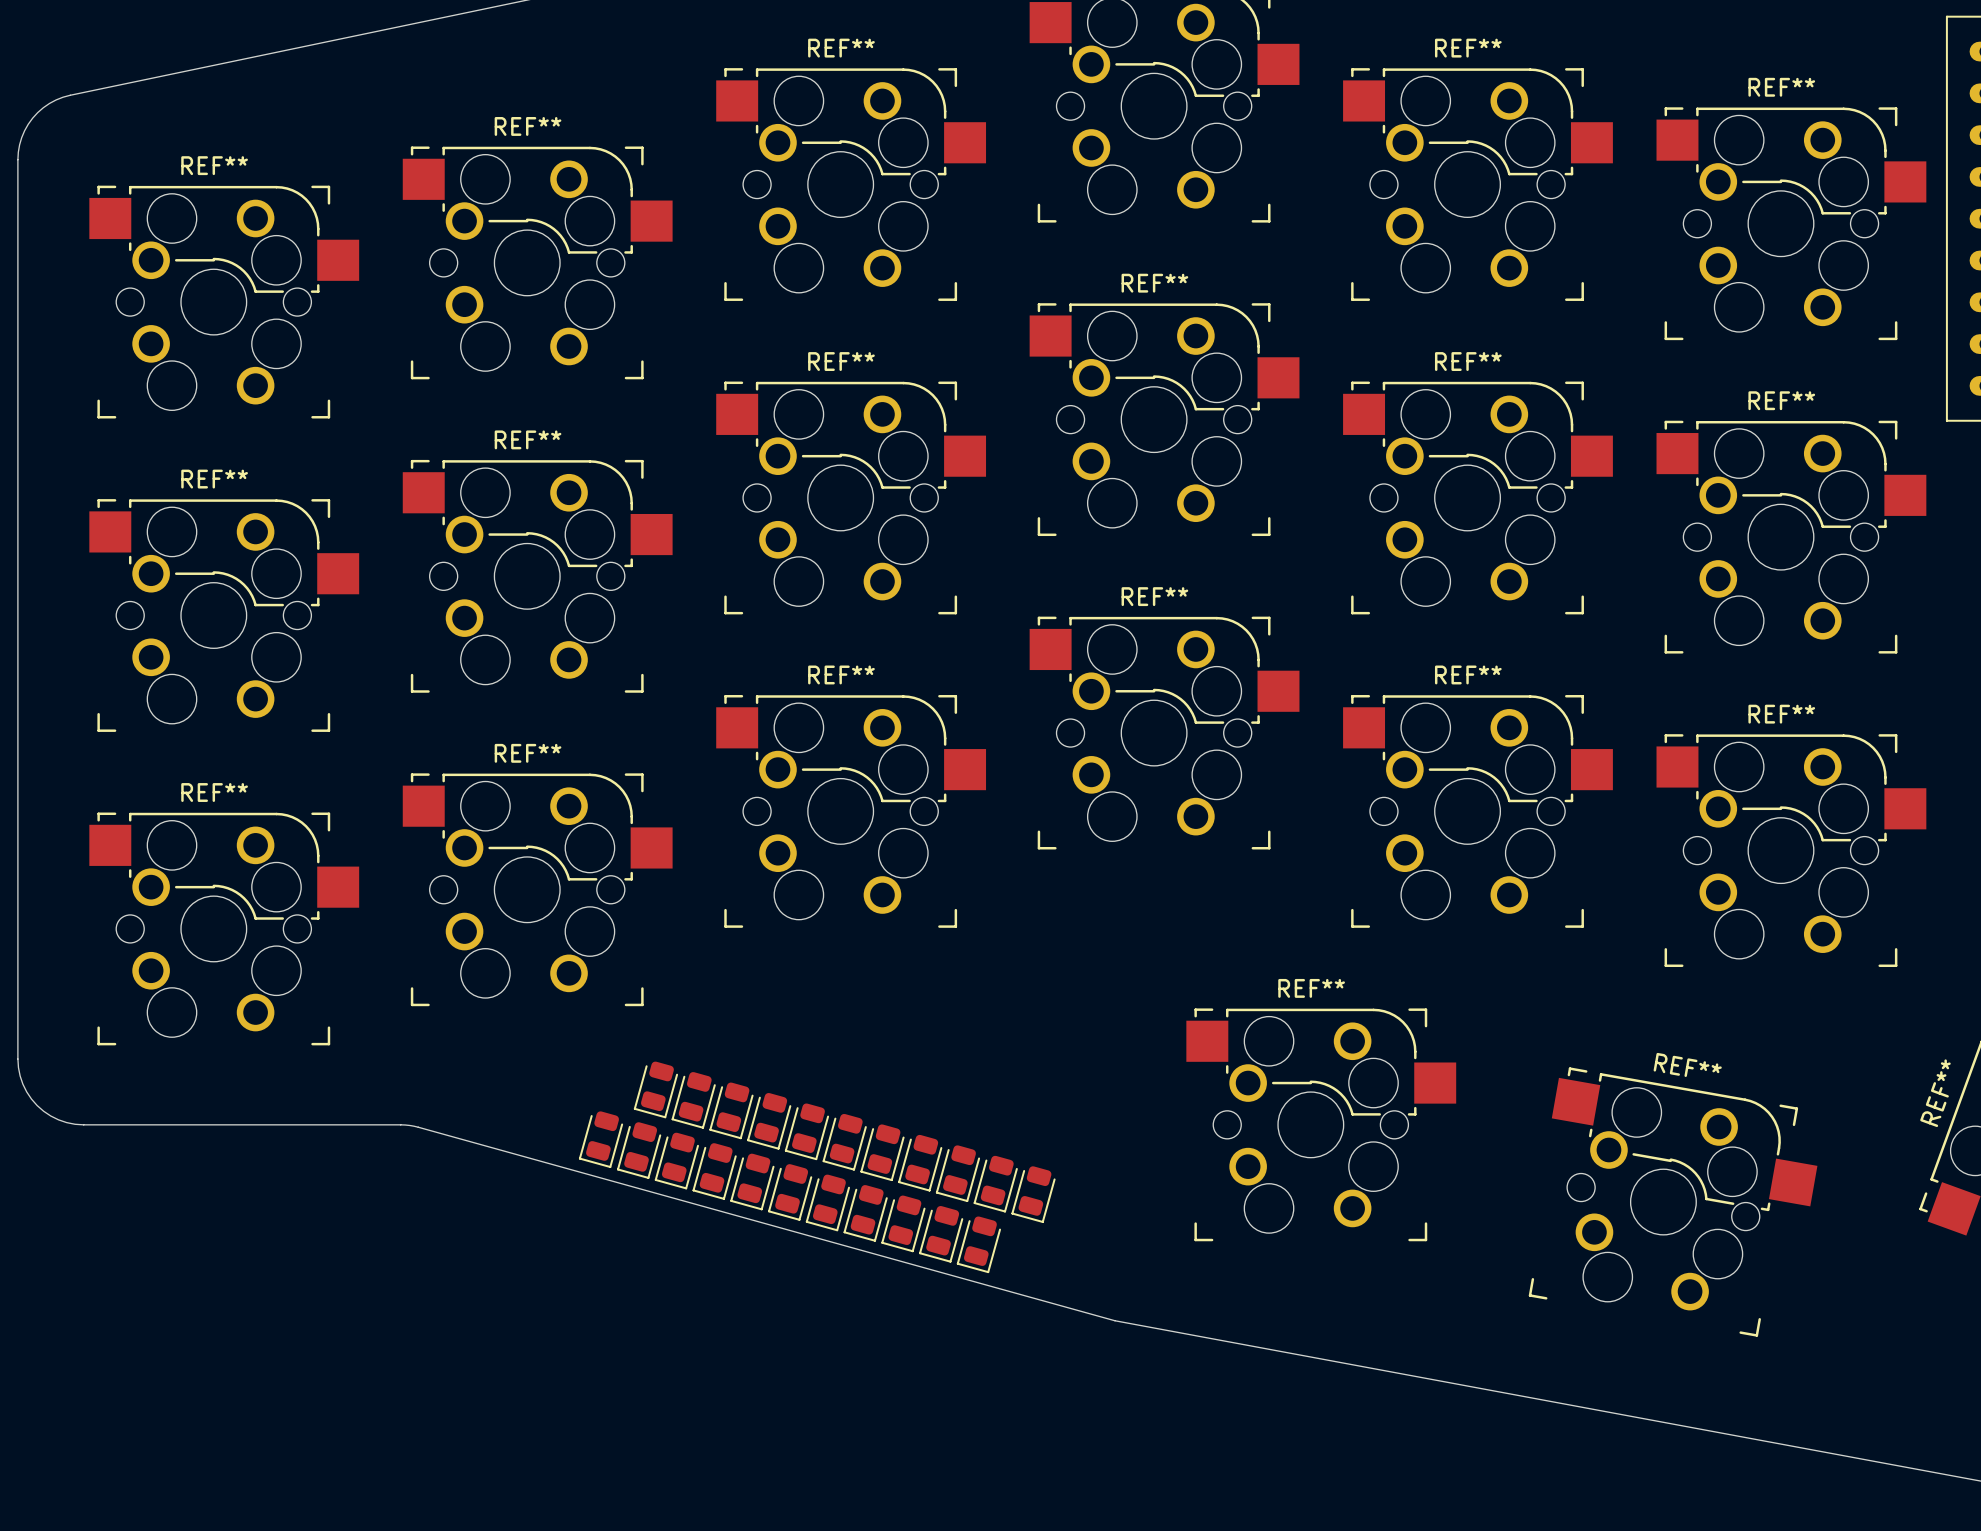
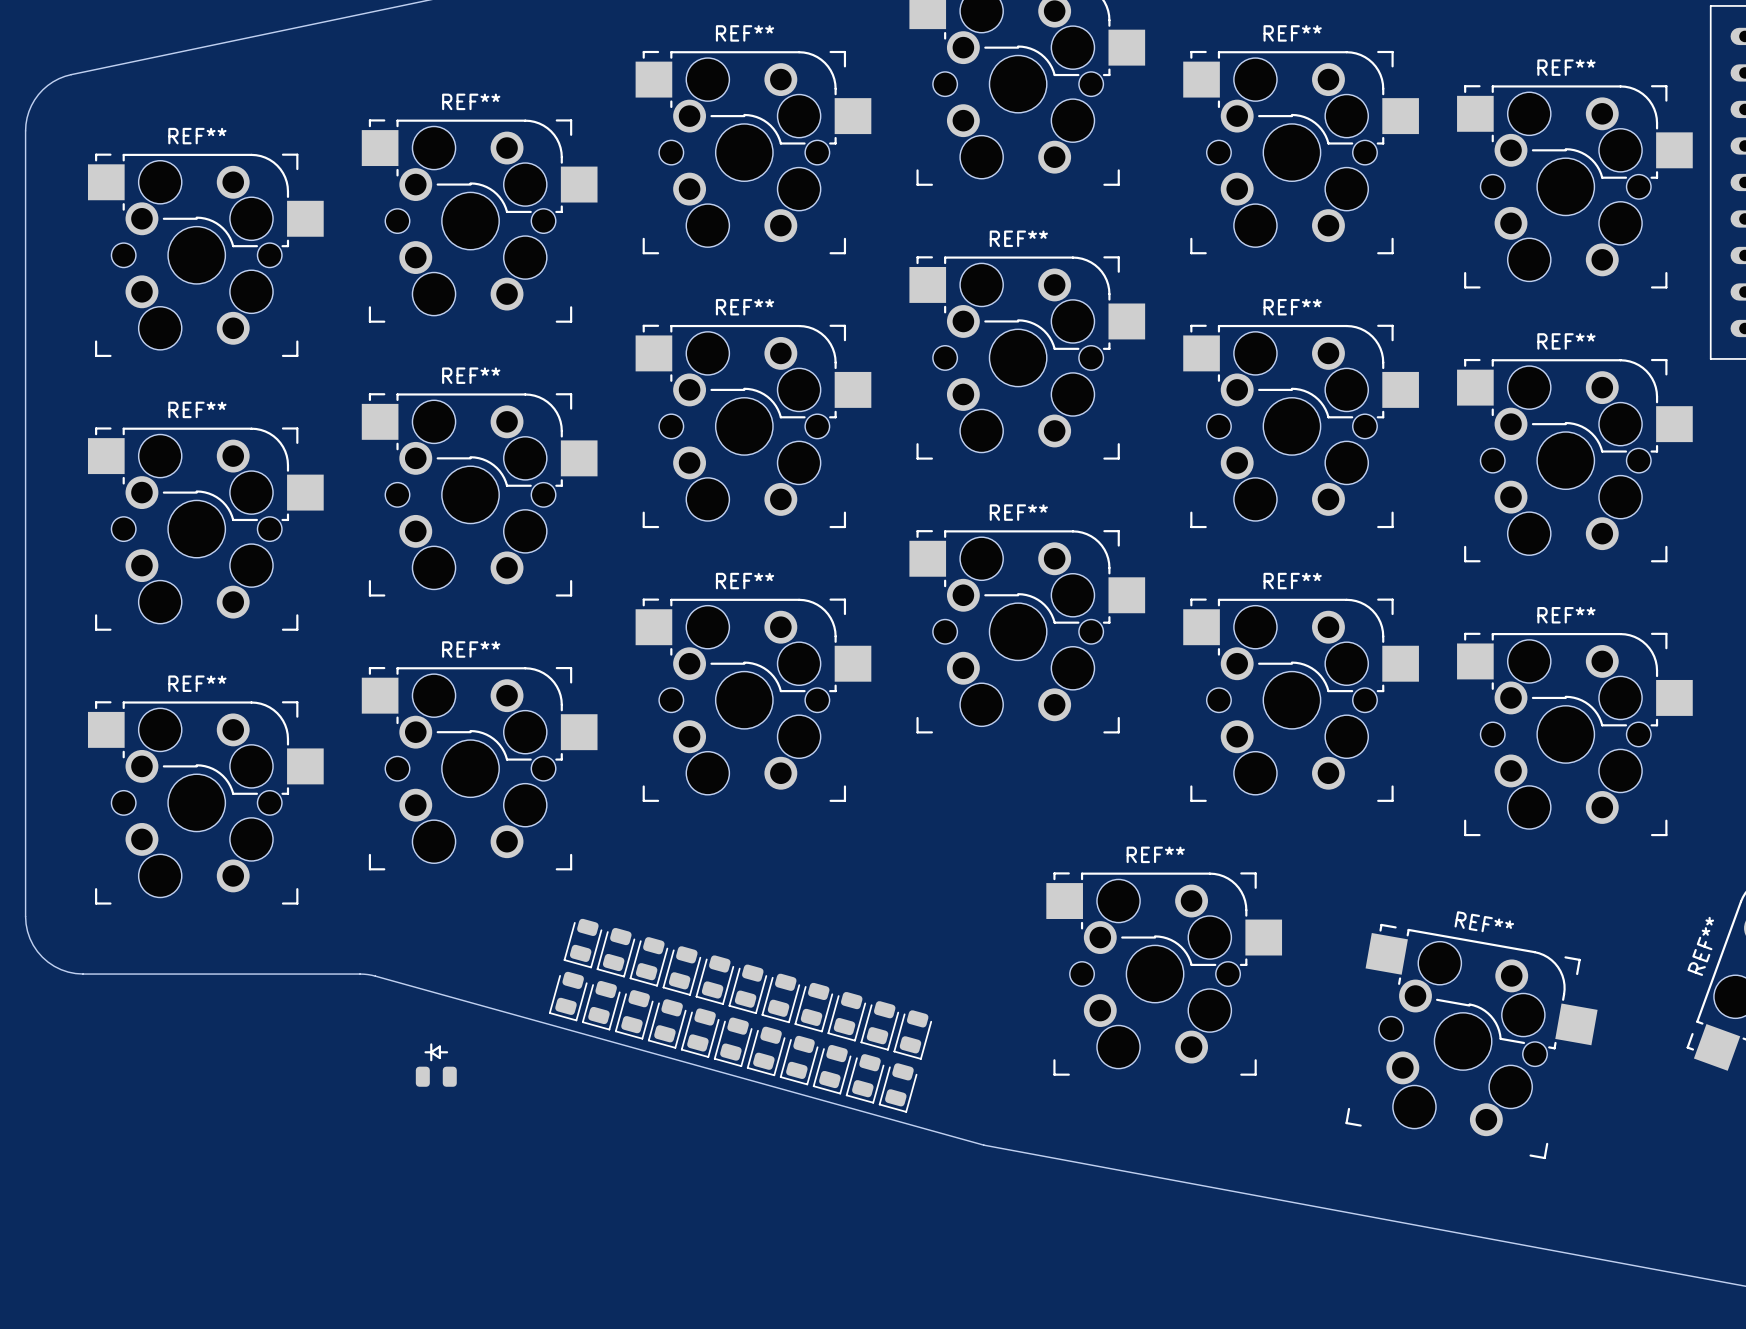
part: (601, 1139) -> none
part: none -> (436, 1065)
part: none -> (898, 1087)

